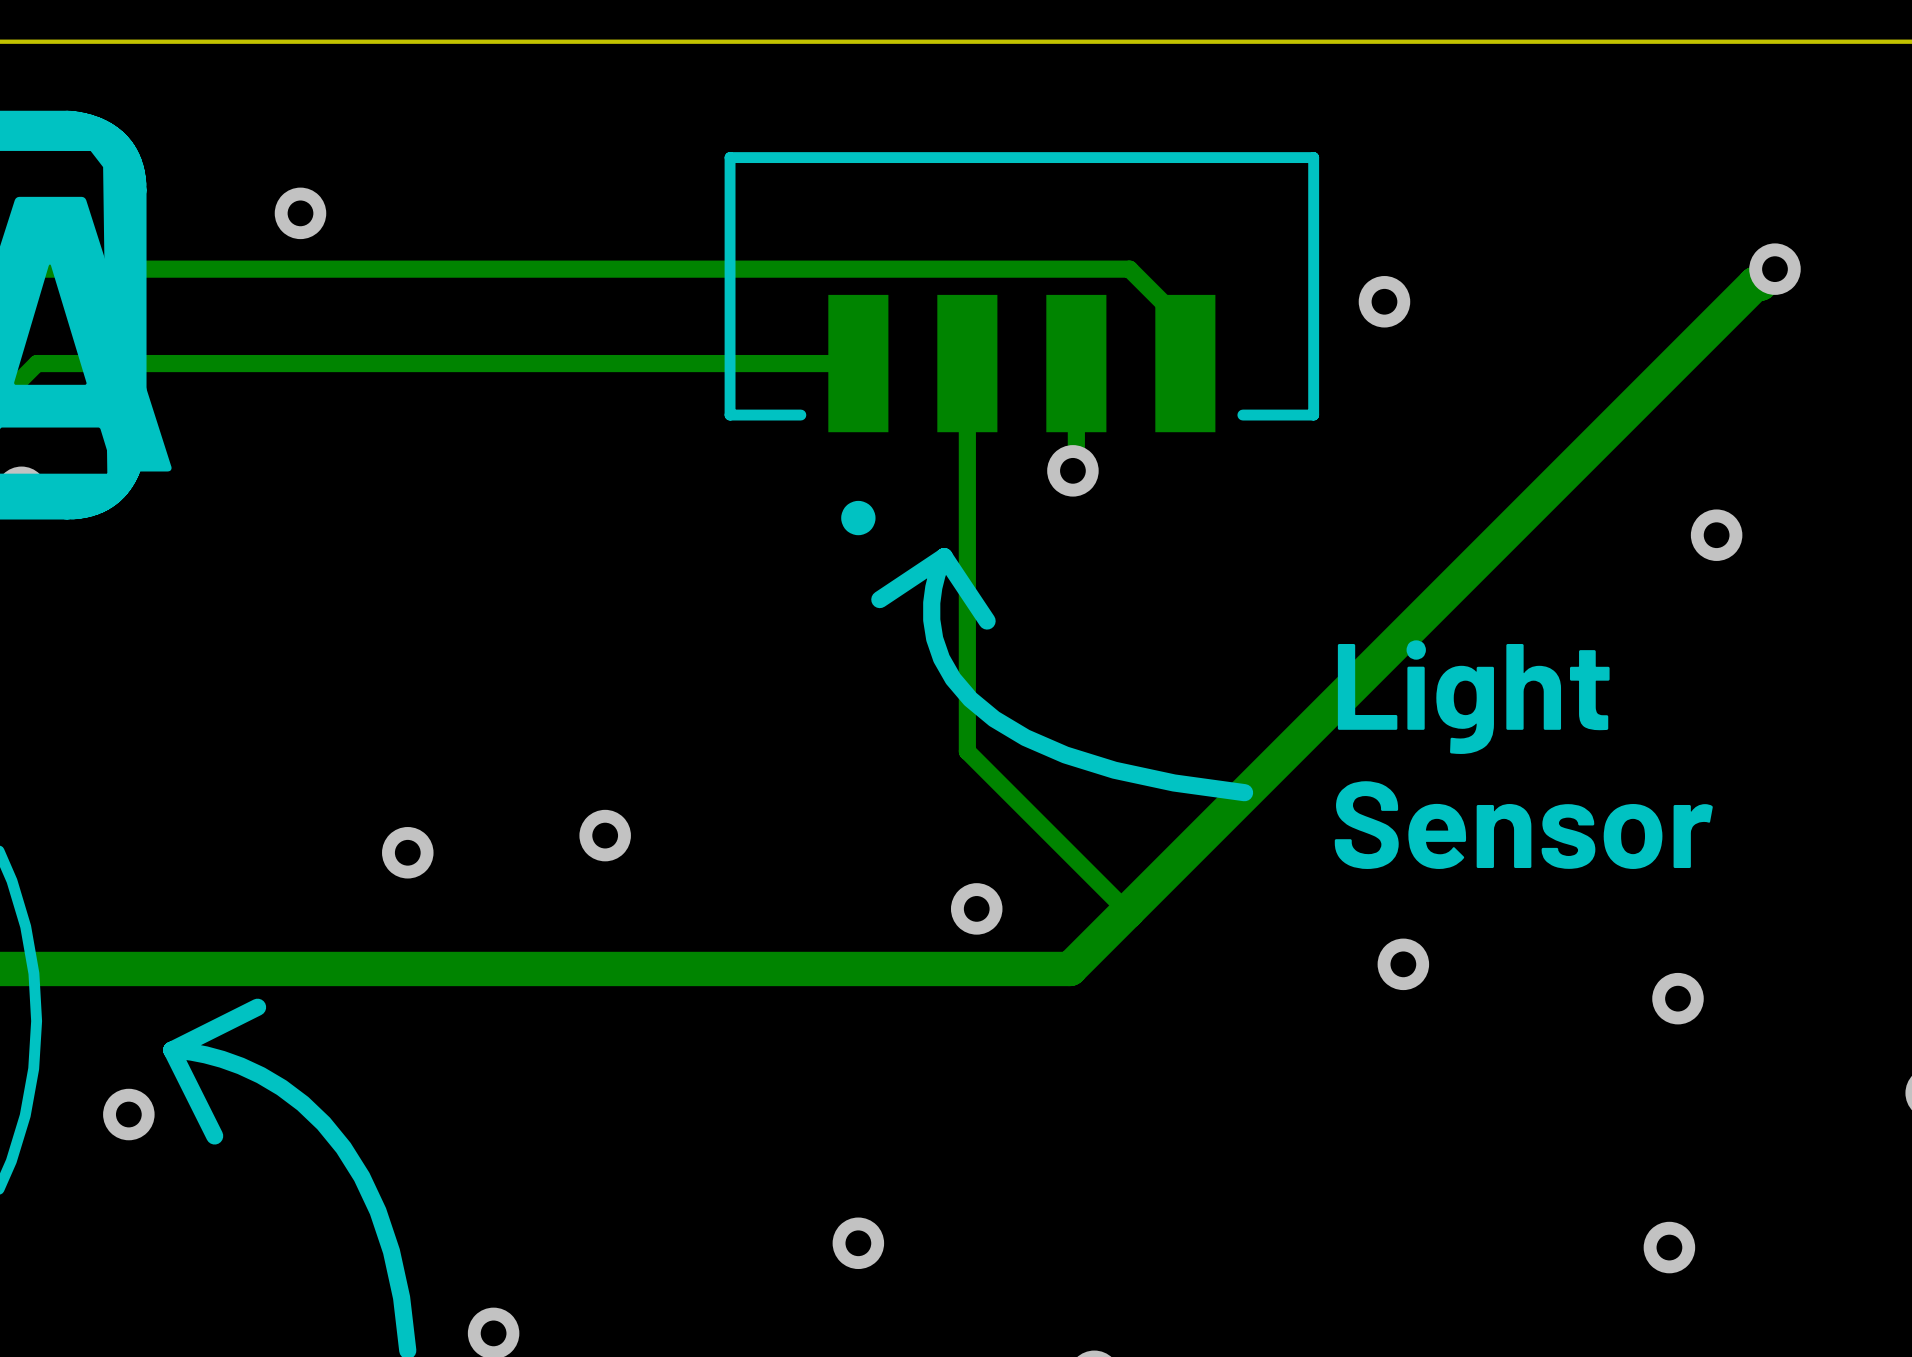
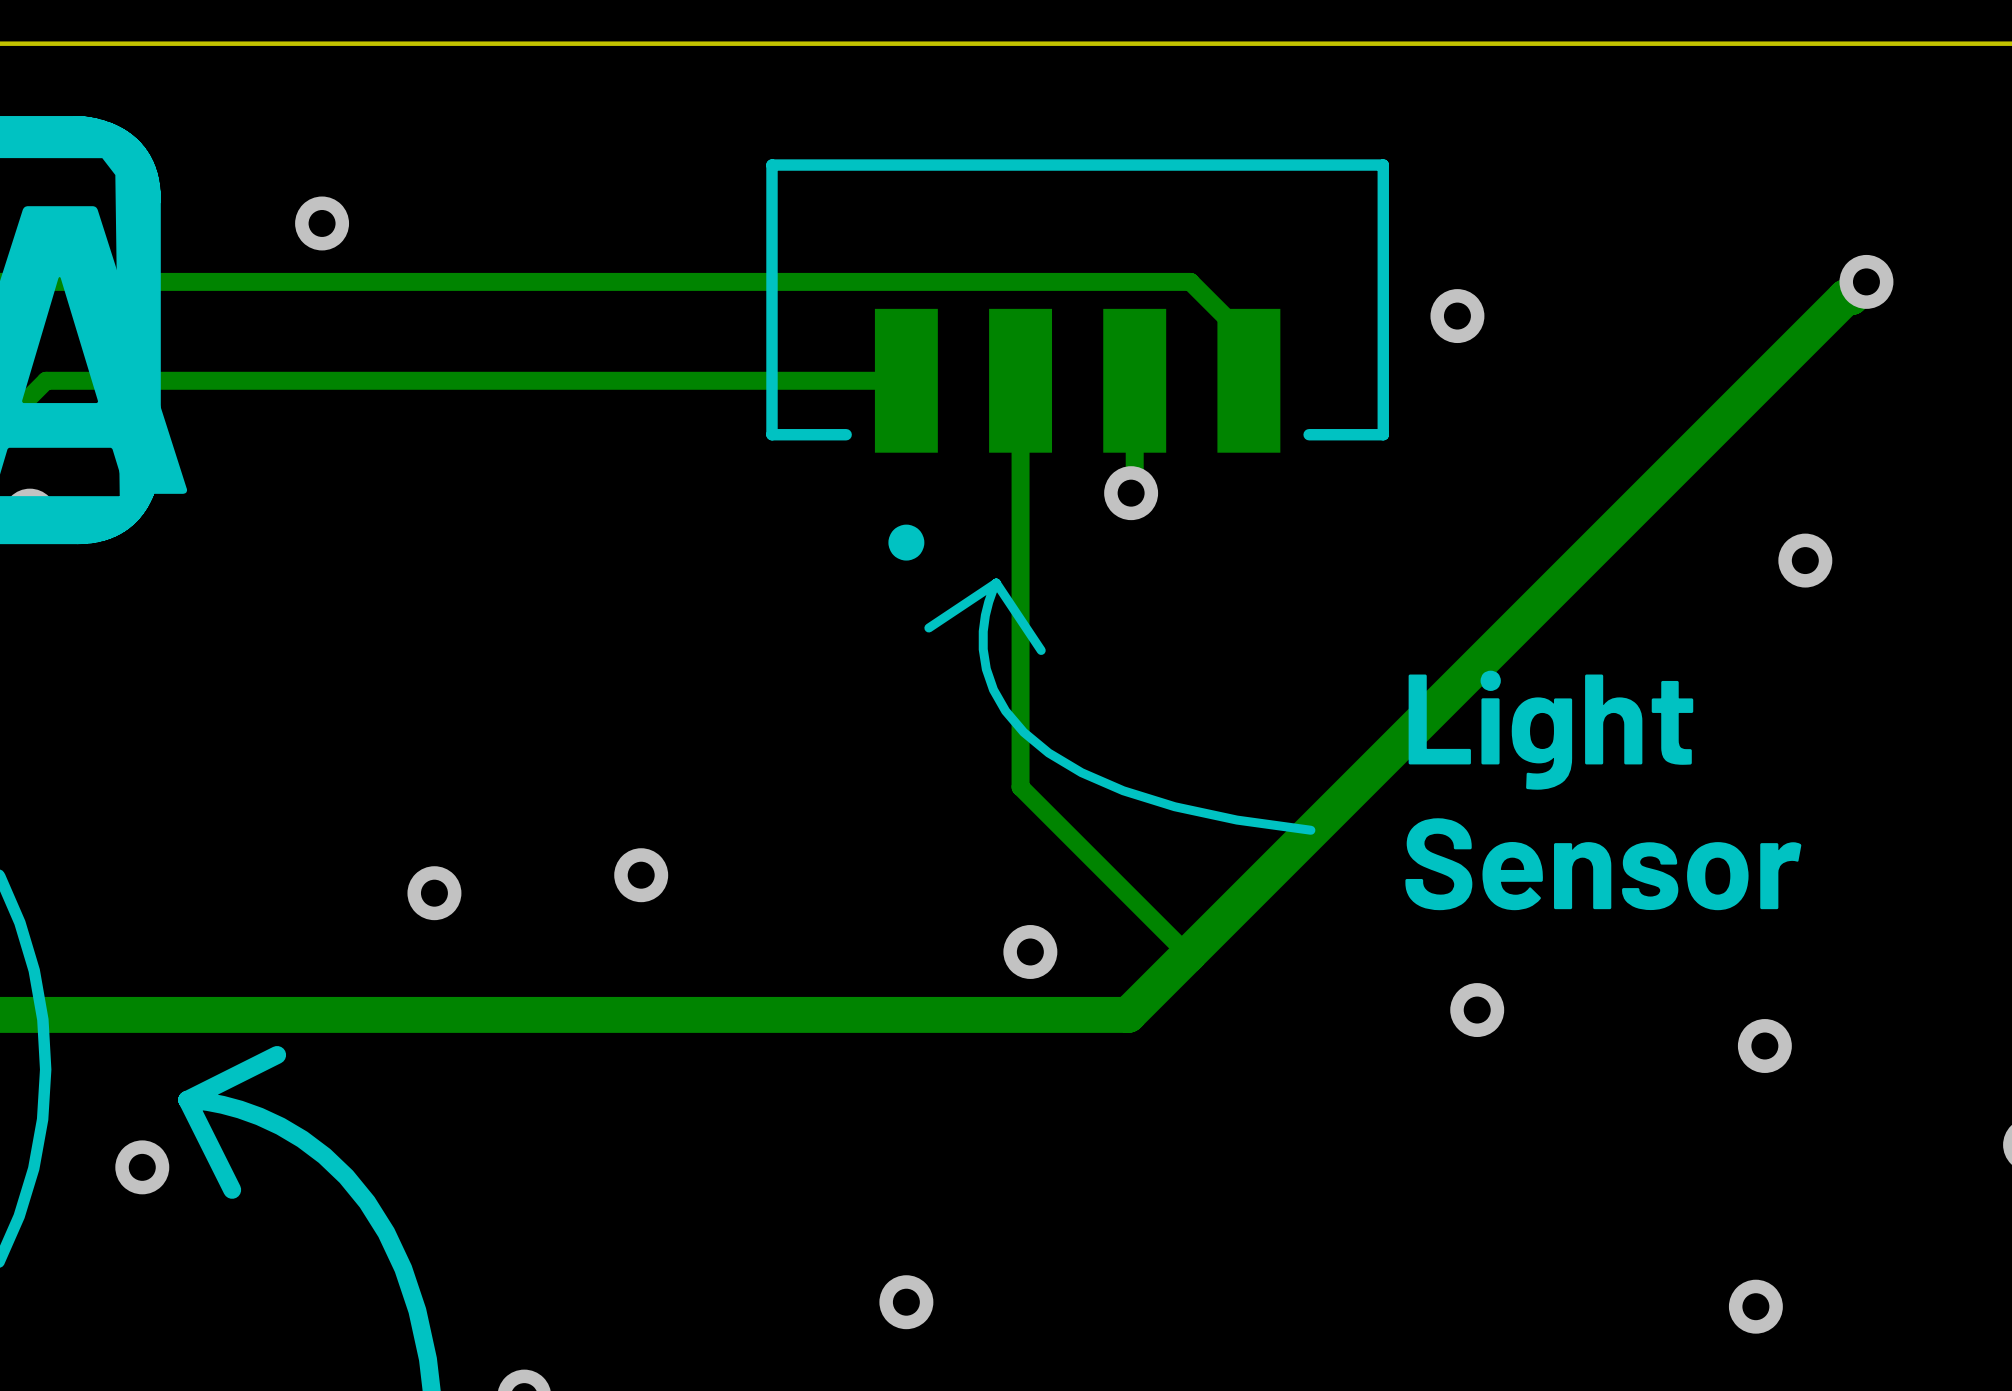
line width: thick (944, 556) (987, 621) -> thin (996, 583) (1041, 650)
line width: thick (944, 556) (879, 599) -> thin (996, 583) (928, 627)
line width: thick (944, 556) (936, 574) (931, 602) (934, 638) (941, 658) (953, 678) (970, 699) (994, 718) (1025, 737) (1065, 754) (1114, 770) (1174, 782) (1244, 792) -> thin (996, 583) (988, 602) (983, 631) (986, 669) (993, 689) (1005, 711) (1023, 732) (1048, 753) (1081, 772) (1123, 790) (1174, 806) (1237, 820) (1310, 830)

